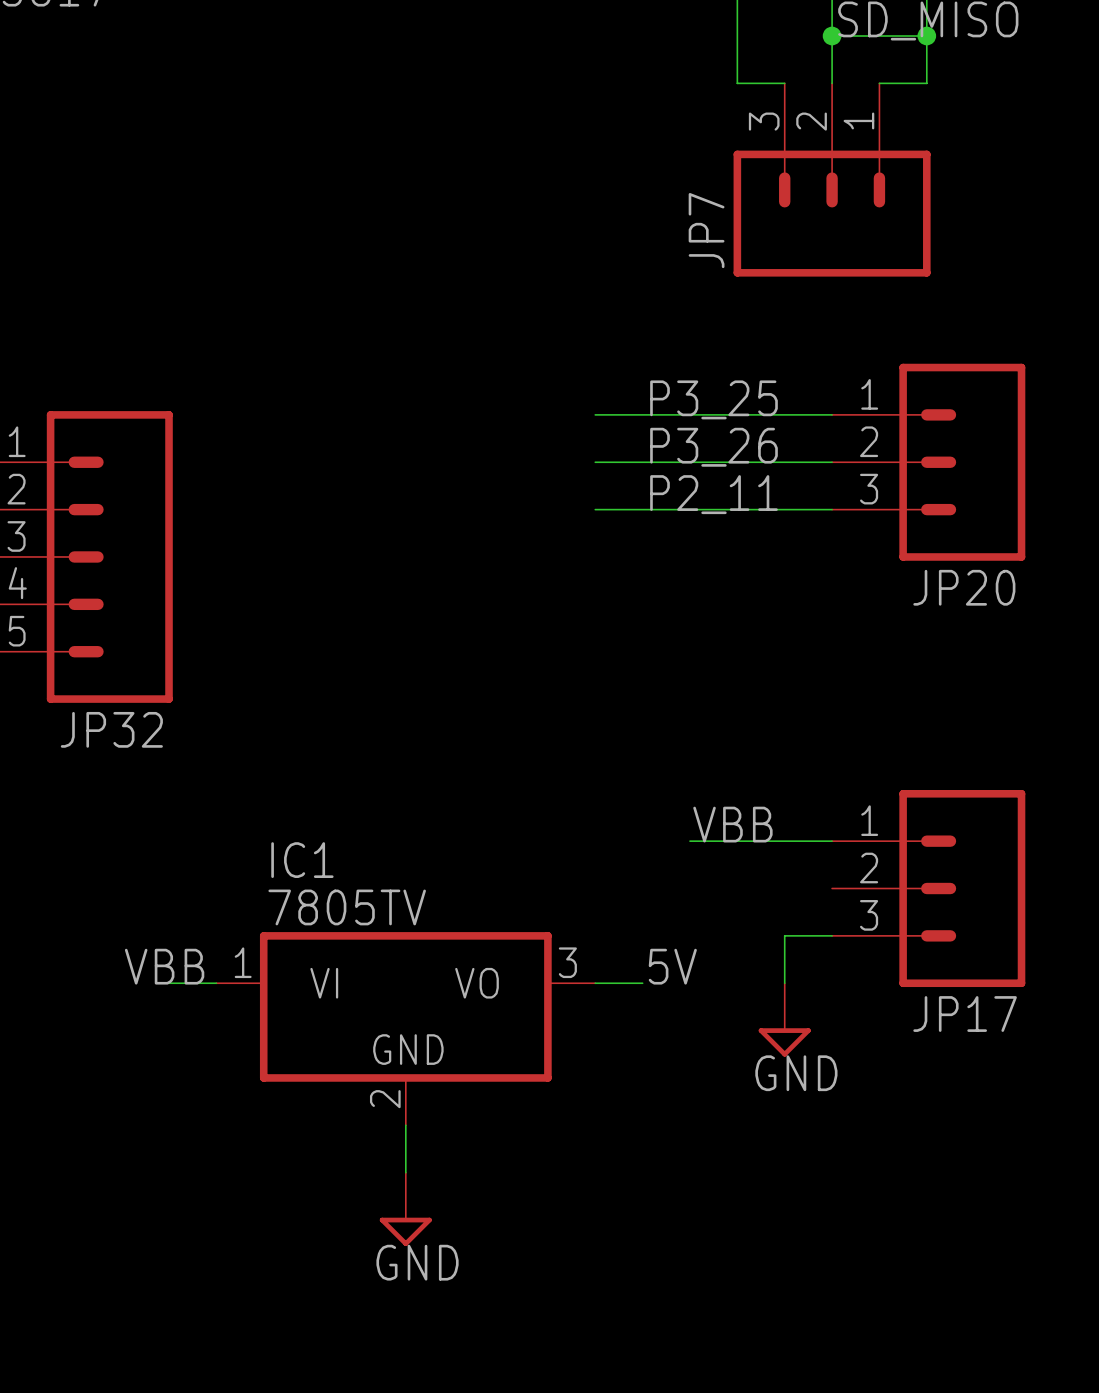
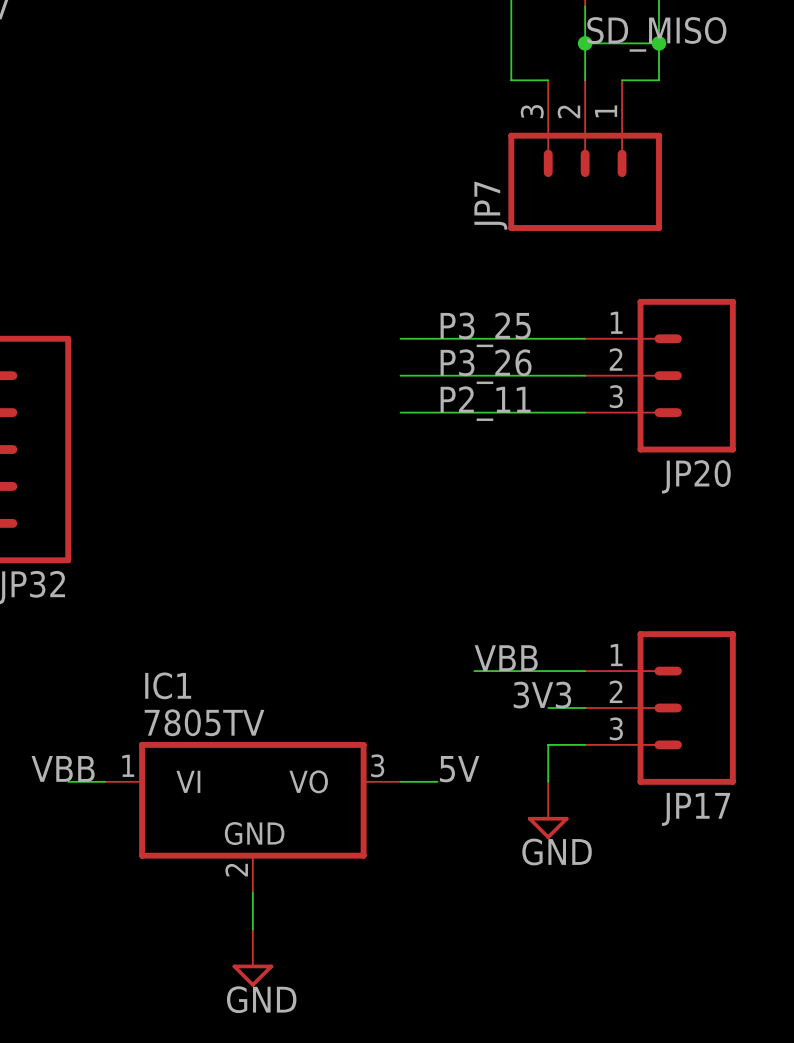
label: none -> 3V3 (542, 695)
wire: none -> (548, 707) (585, 707)

